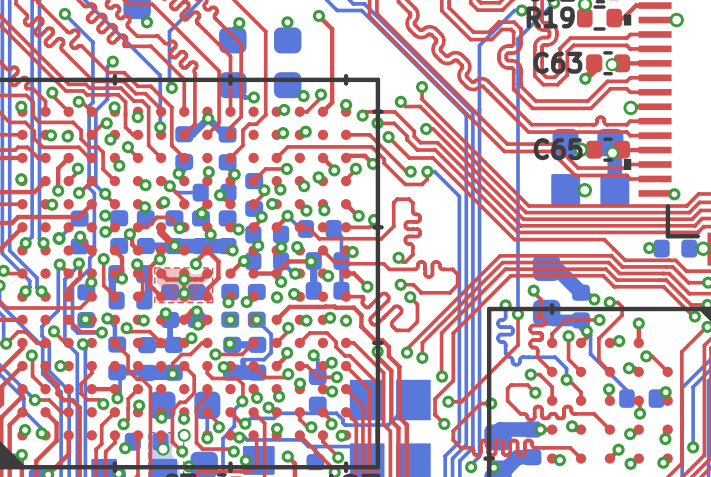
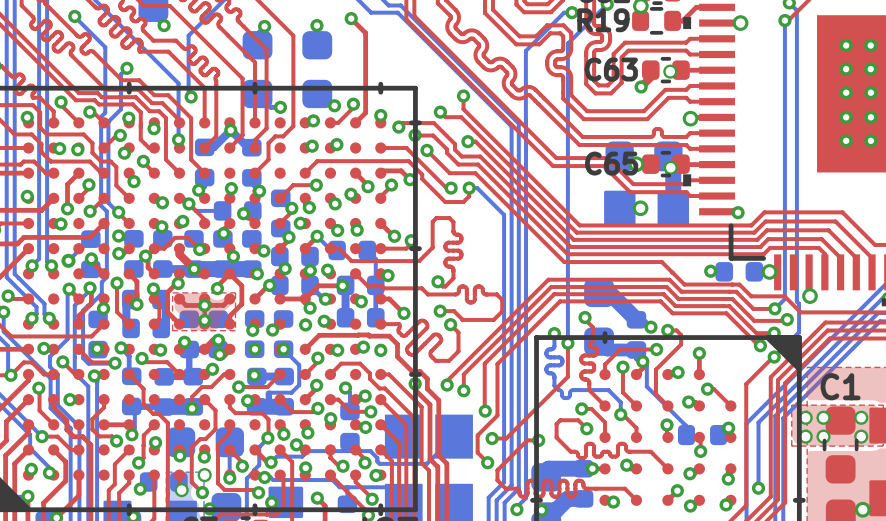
via: none -> (43, 348)

